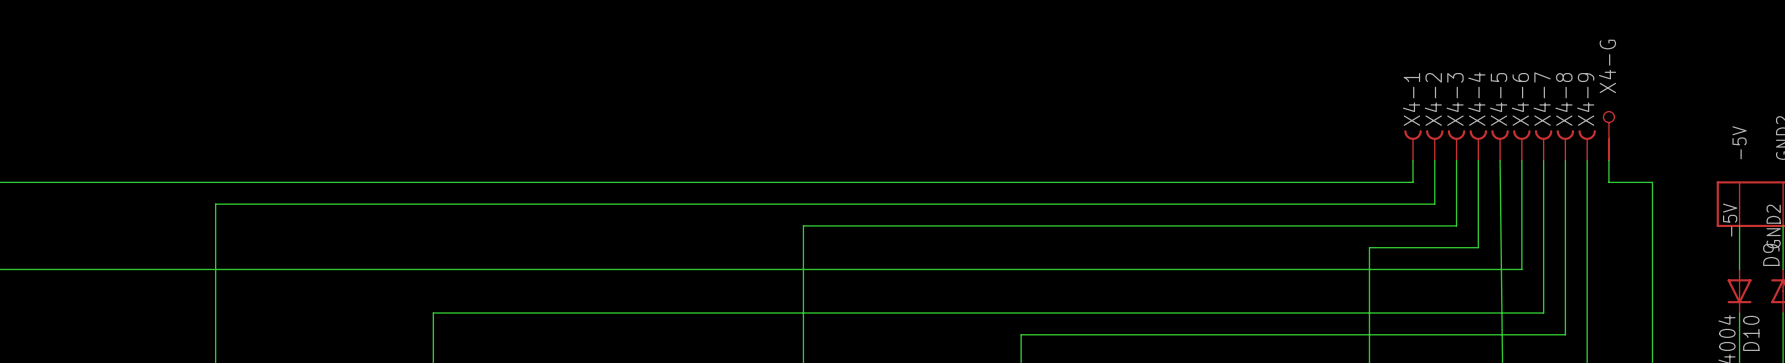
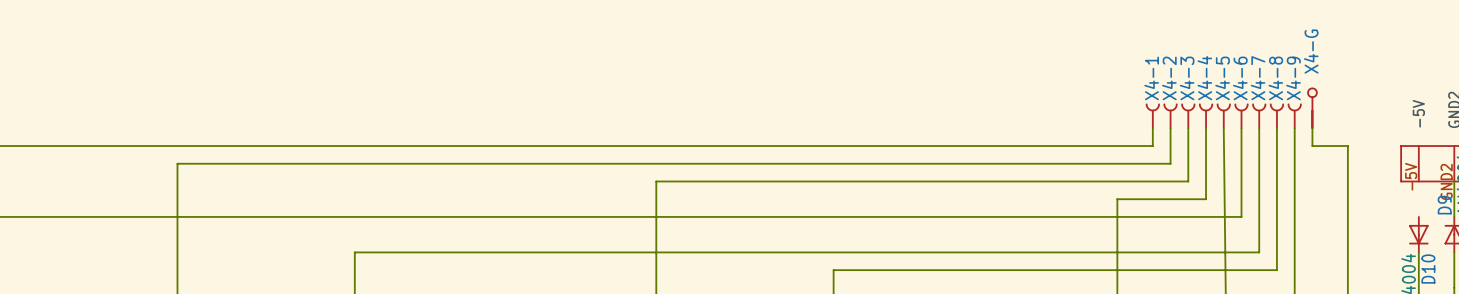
wire: (1739, 225) (1739, 269) -> none

